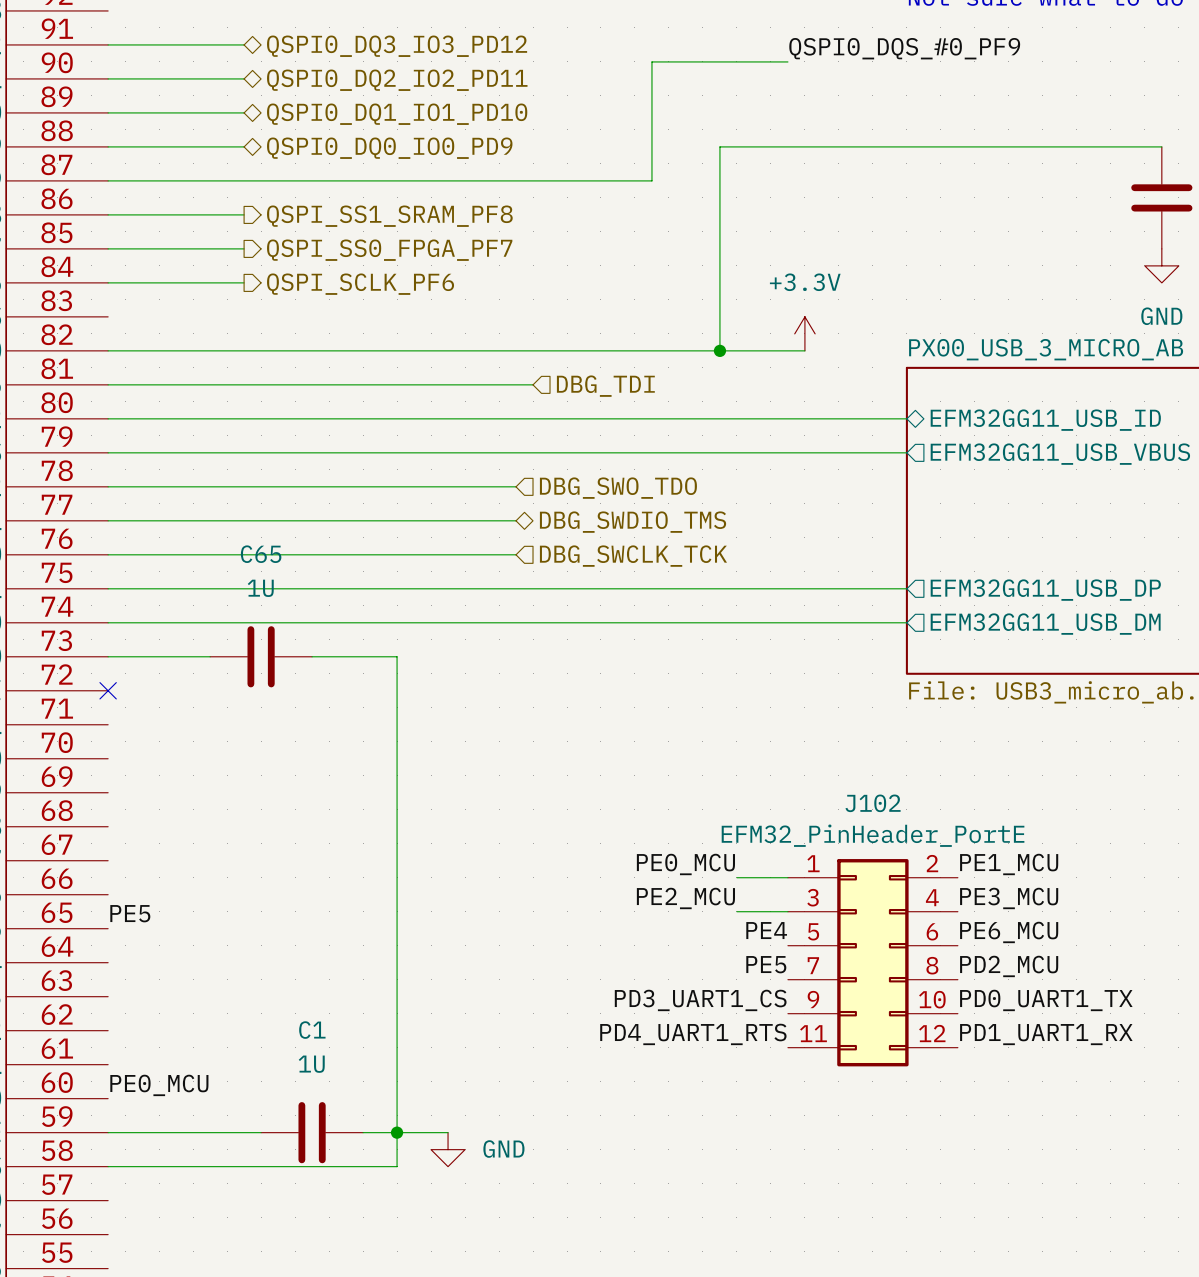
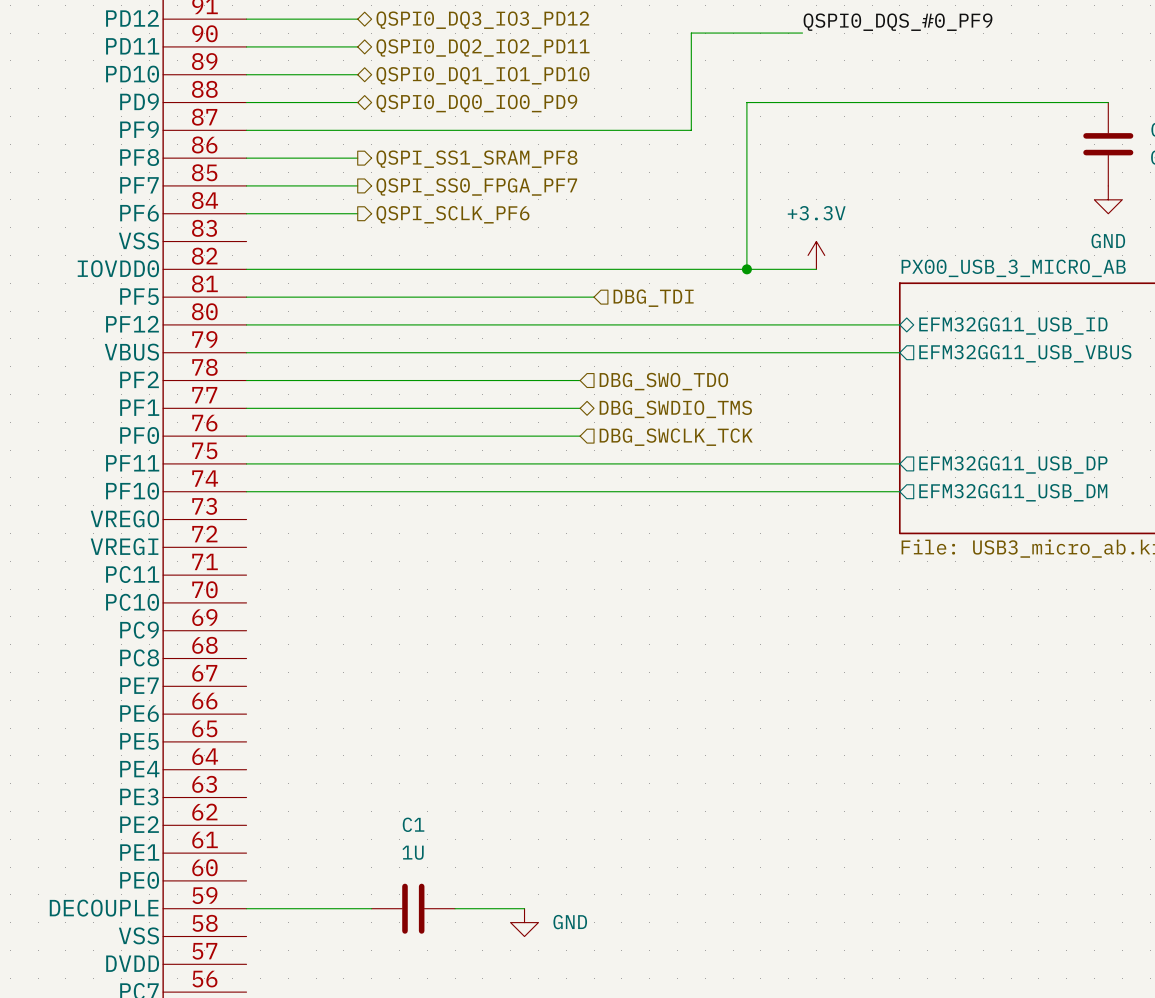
wire: (108, 656) (210, 656) -> none
C65: 1U (261, 656) -> none
wire: (312, 656) (397, 656) (397, 1166) (108, 1166) -> none
no-connect mark: (108, 690) -> none
label: PE0_MCU (685, 864) -> none
label: PE1_MCU (1009, 864) -> none
wire: (736, 877) (787, 877) -> none
label: PE2_MCU (685, 898) -> none
label: PE3_MCU (1009, 898) -> none
wire: (736, 911) (787, 911) -> none
label: PE5 (130, 913) -> none
label: PE4 (766, 930) -> none
label: PE6_MCU (1009, 932) -> none
J102: EFM32_PinHeader_PortE (872, 962) -> none
label: PE5 (766, 964) -> none
label: PD2_MCU (1009, 966) -> none
label: PD3_UART1_CS (700, 1000) -> none
label: PD0_UART1_TX (1046, 1000) -> none
label: PD4_UART1_RTS (693, 1034) -> none
label: PD1_UART1_RX (1046, 1034) -> none
label: PE0_MCU (159, 1085) -> none
junction: (397, 1132) -> none

